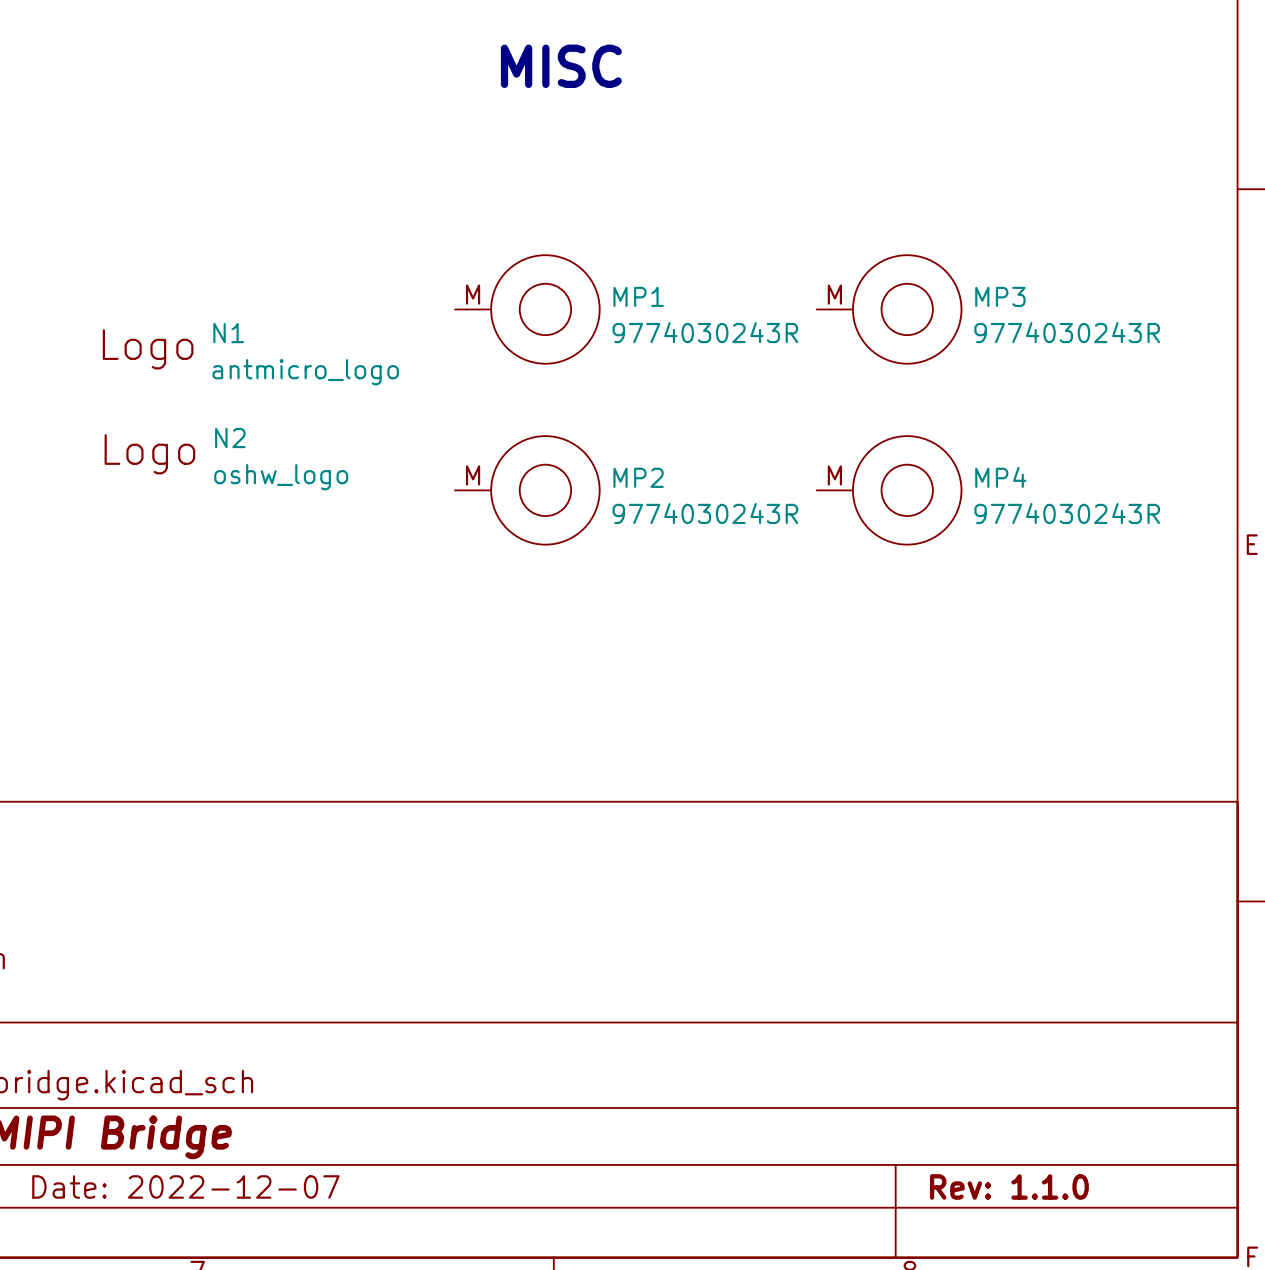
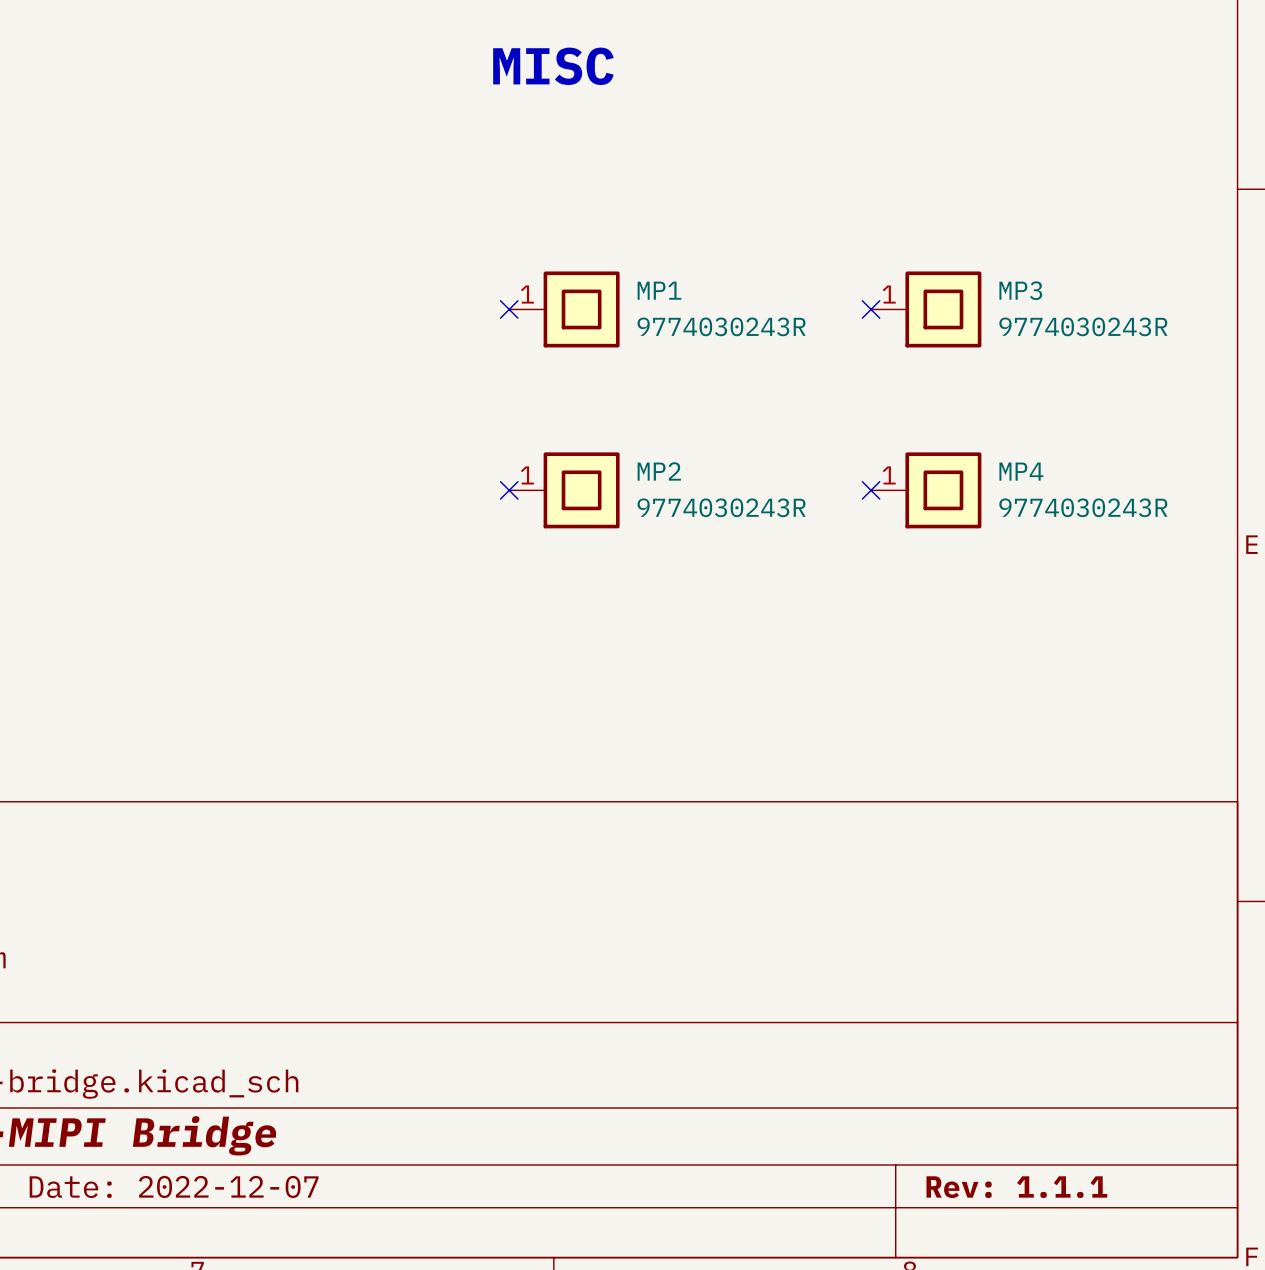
MP1 symbol: [454, 255, 600, 364] -> [509, 271, 620, 348]
MP3 symbol: [816, 255, 962, 364] -> [871, 271, 982, 348]
no-connect mark: none -> (509, 309)
no-connect mark: none -> (871, 309)
MP1 text: none -> 9774030243R (721, 326)
MP3 text: none -> 9774030243R (1083, 326)
MP1 value: 9774030243R (705, 332) -> none
MP3 value: 9774030243R (1067, 332) -> none
N1: antmicro_logo (250, 354) -> none
MP2 symbol: [454, 436, 600, 545] -> [509, 452, 620, 529]
MP4 symbol: [816, 436, 962, 545] -> [871, 452, 982, 529]
N2: oshw_logo (226, 459) -> none
no-connect mark: none -> (509, 490)
no-connect mark: none -> (871, 490)
MP2 text: none -> 9774030243R (721, 507)
MP4 text: none -> 9774030243R (1083, 507)
MP2 value: 9774030243R (705, 513) -> none
MP4 value: 9774030243R (1067, 513) -> none
title block: Rev: 1.1.0 (1009, 1186) -> Rev: 1.1.1 (1016, 1187)

